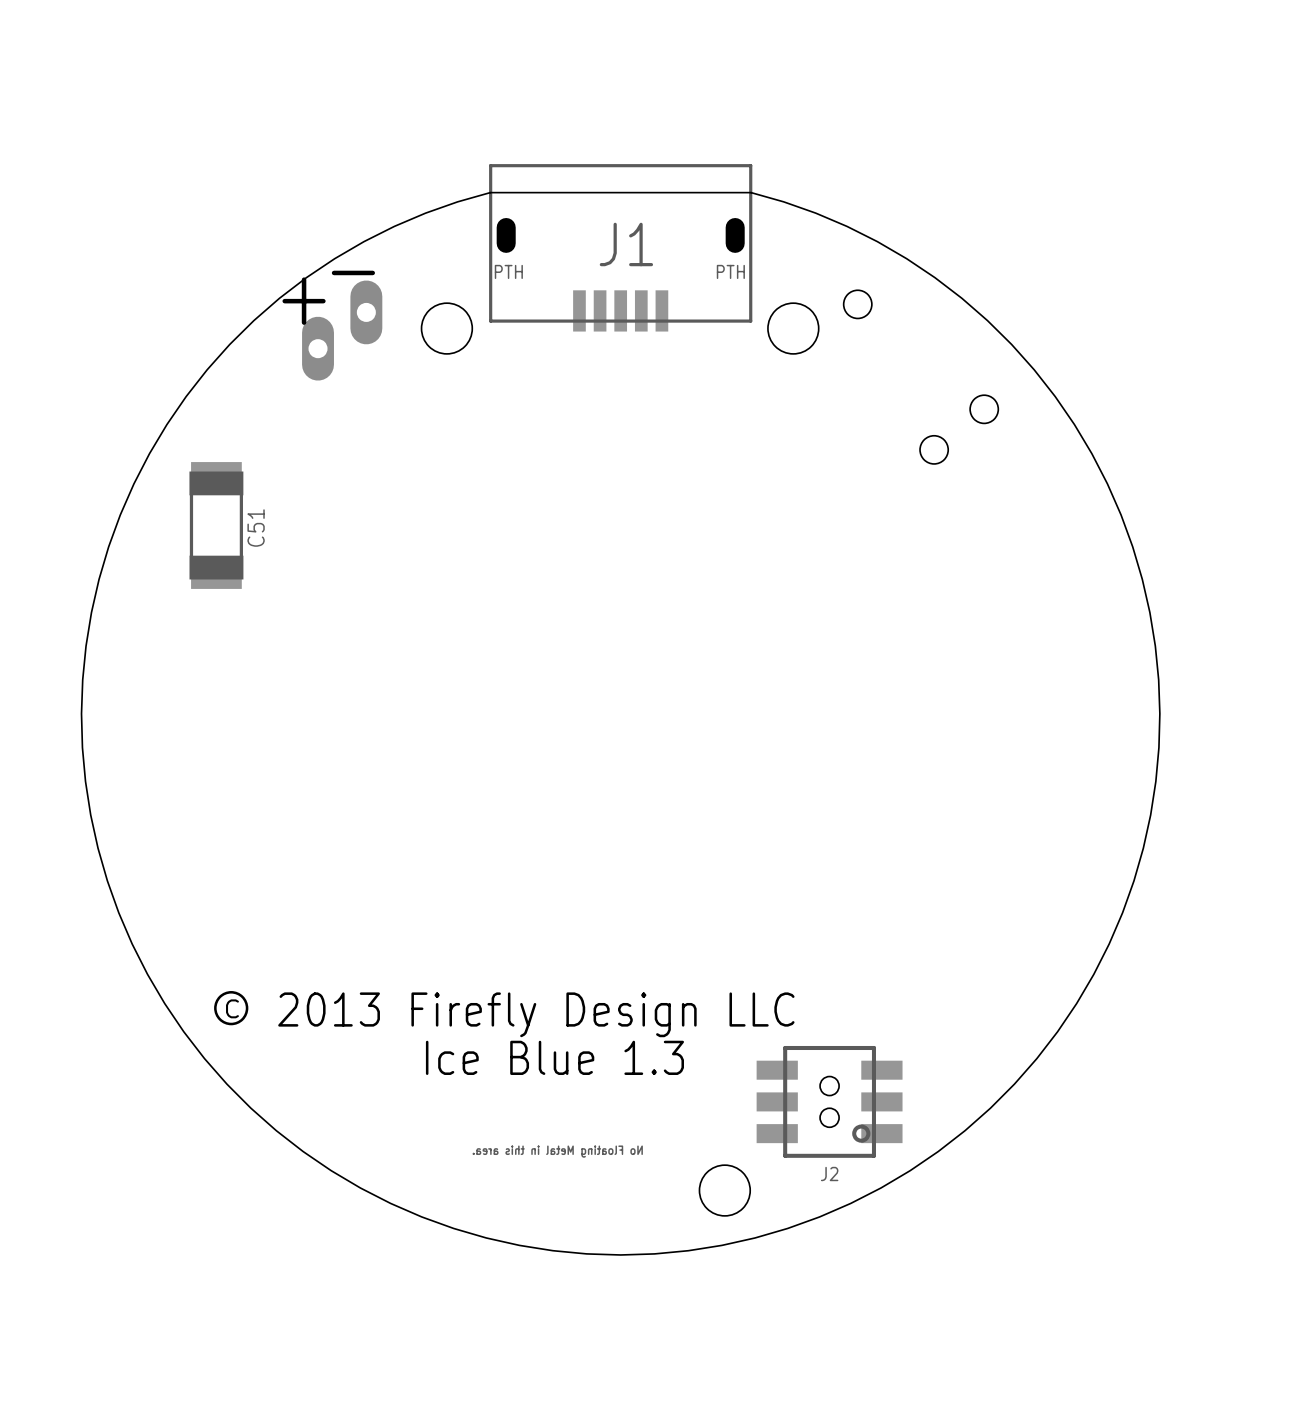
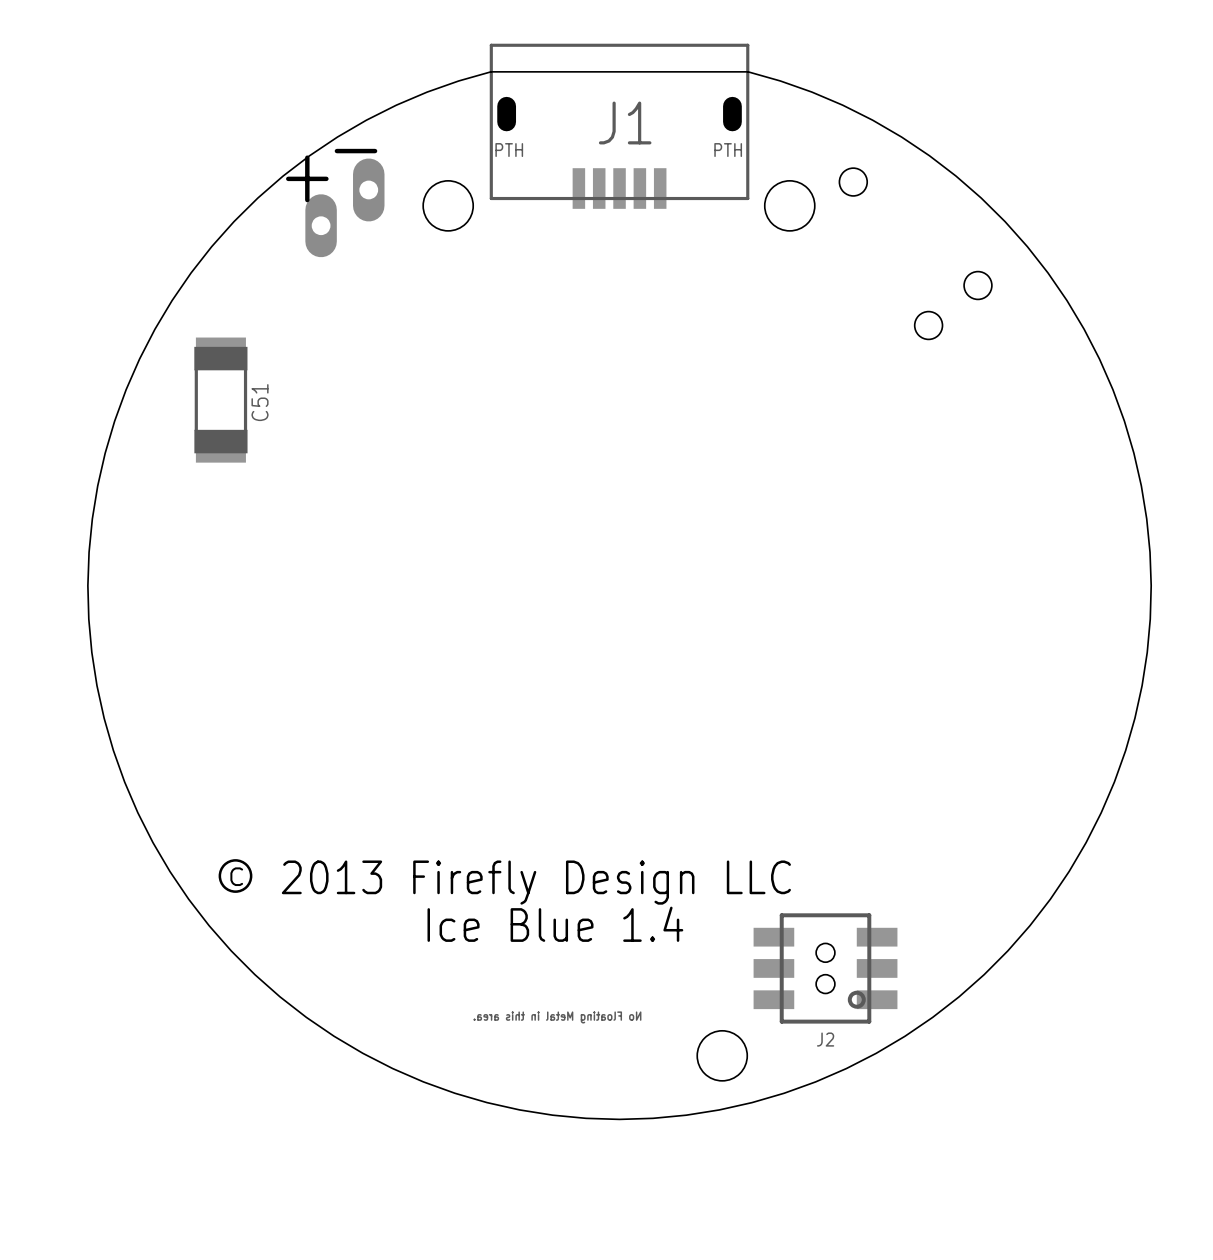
text: Ice Blue 1.3 (554, 1057) -> Ice Blue 1.4 (555, 924)

